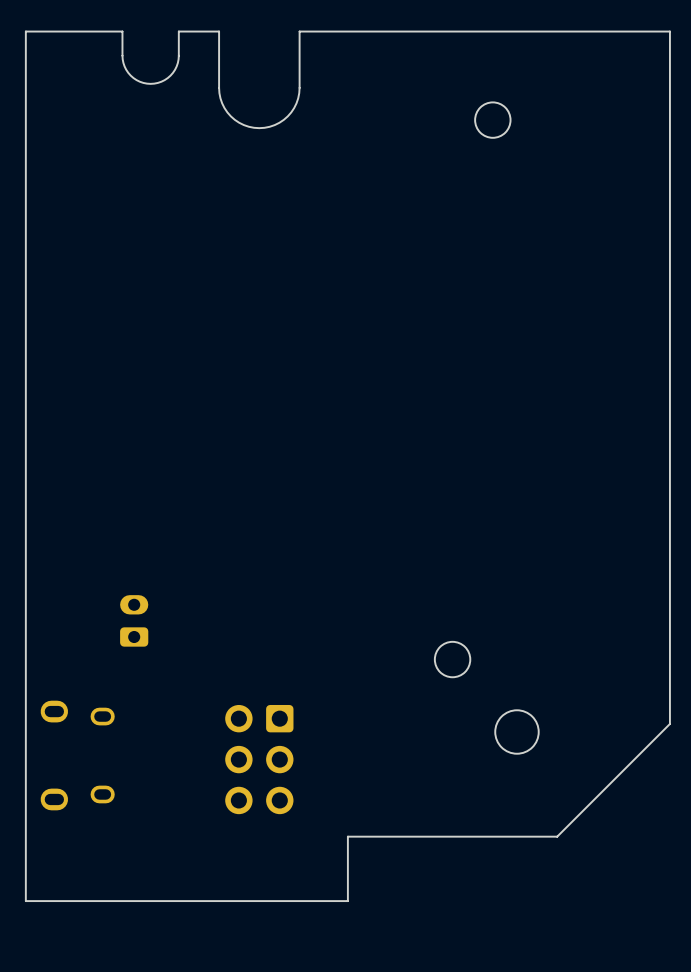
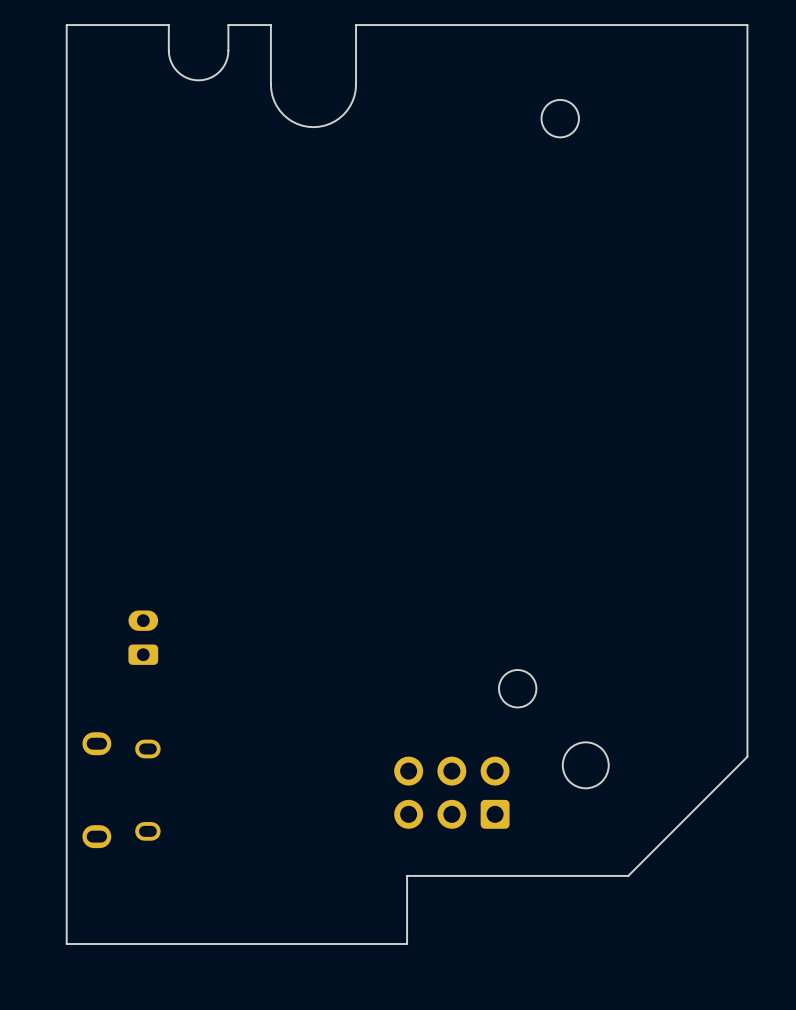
part position: (134, 620) -> (143, 637)
part rotation: 0° (259, 759) -> 90° clockwise (451, 792)
part position: (259, 759) -> (451, 792)

